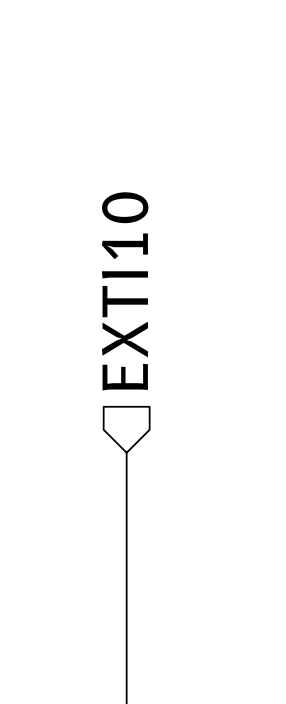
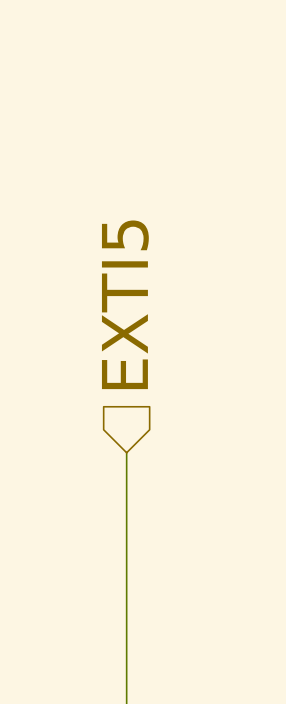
hierarchical label: EXTI10 (125, 291) -> EXTI5 (125, 304)

